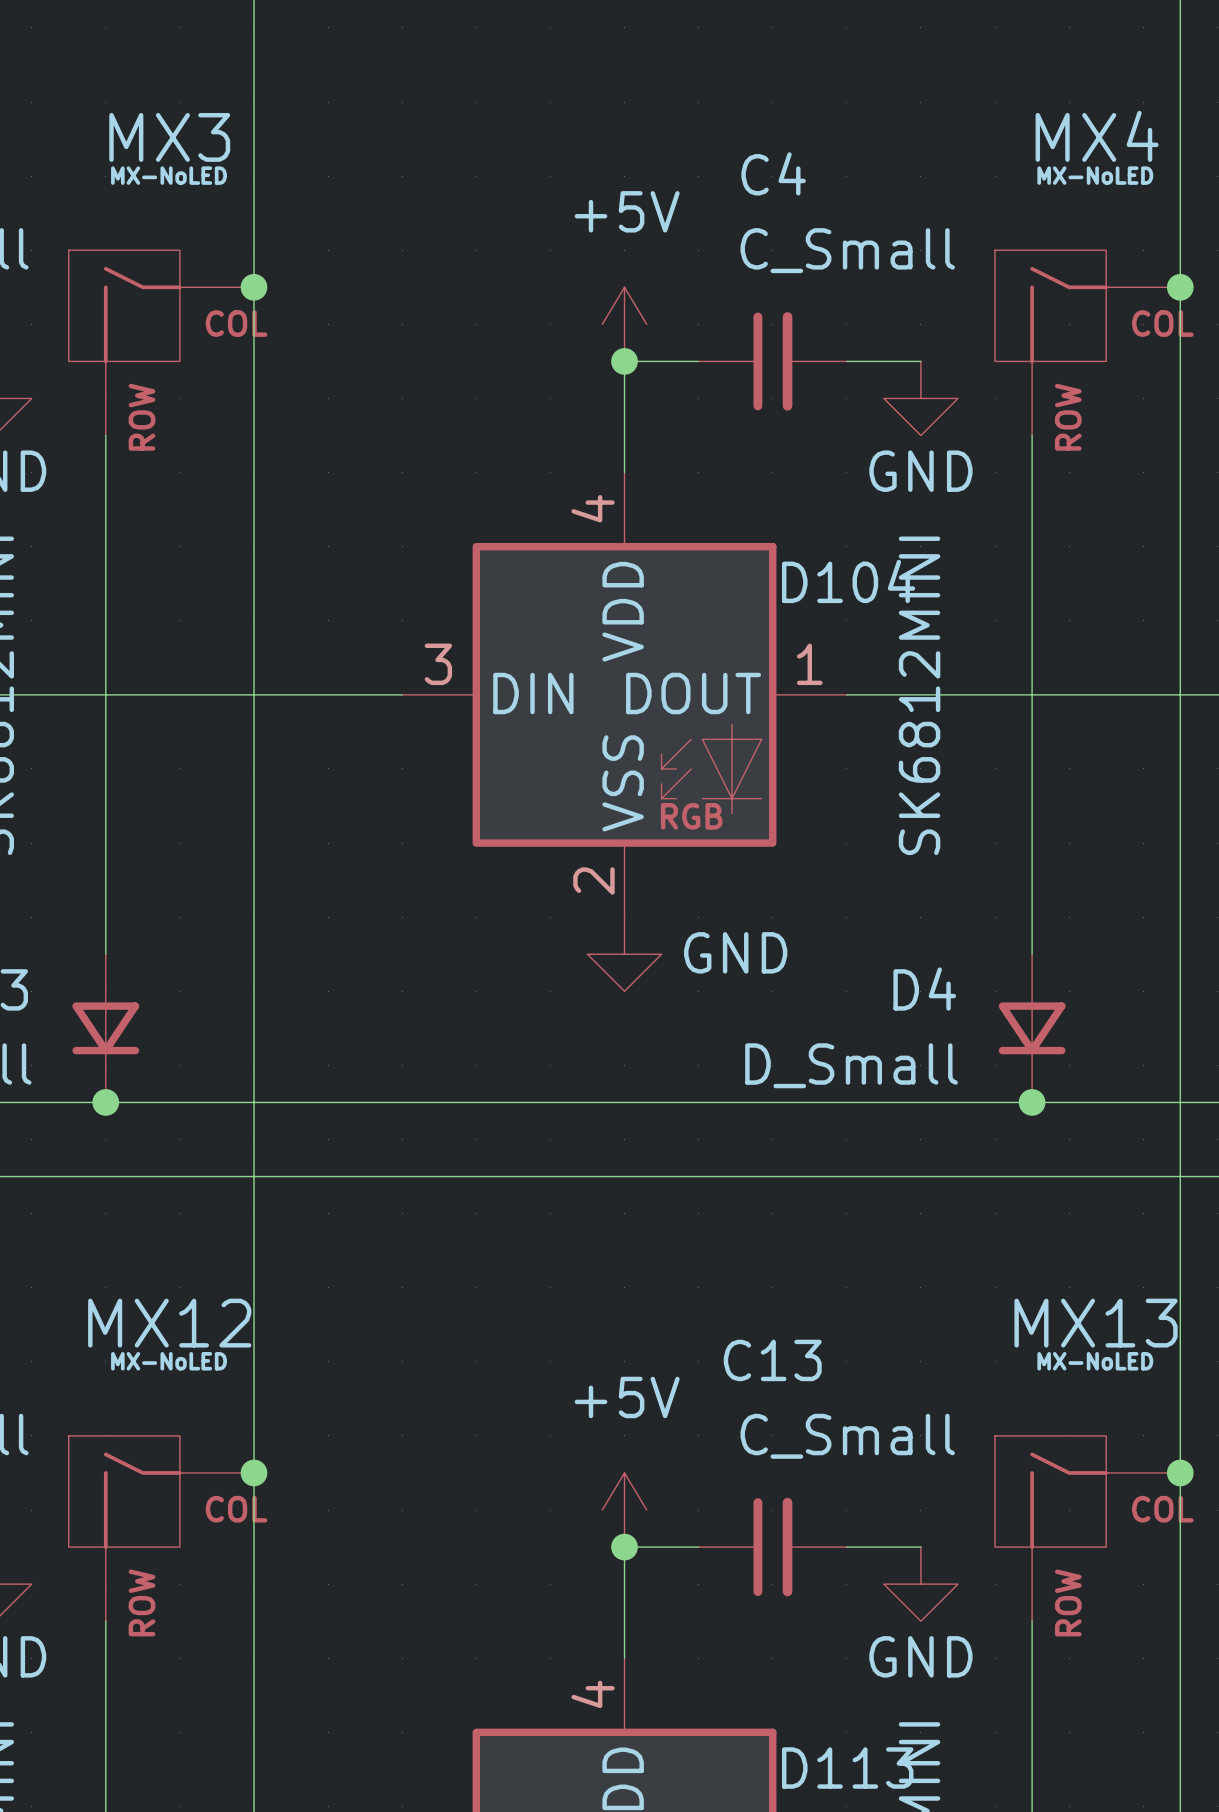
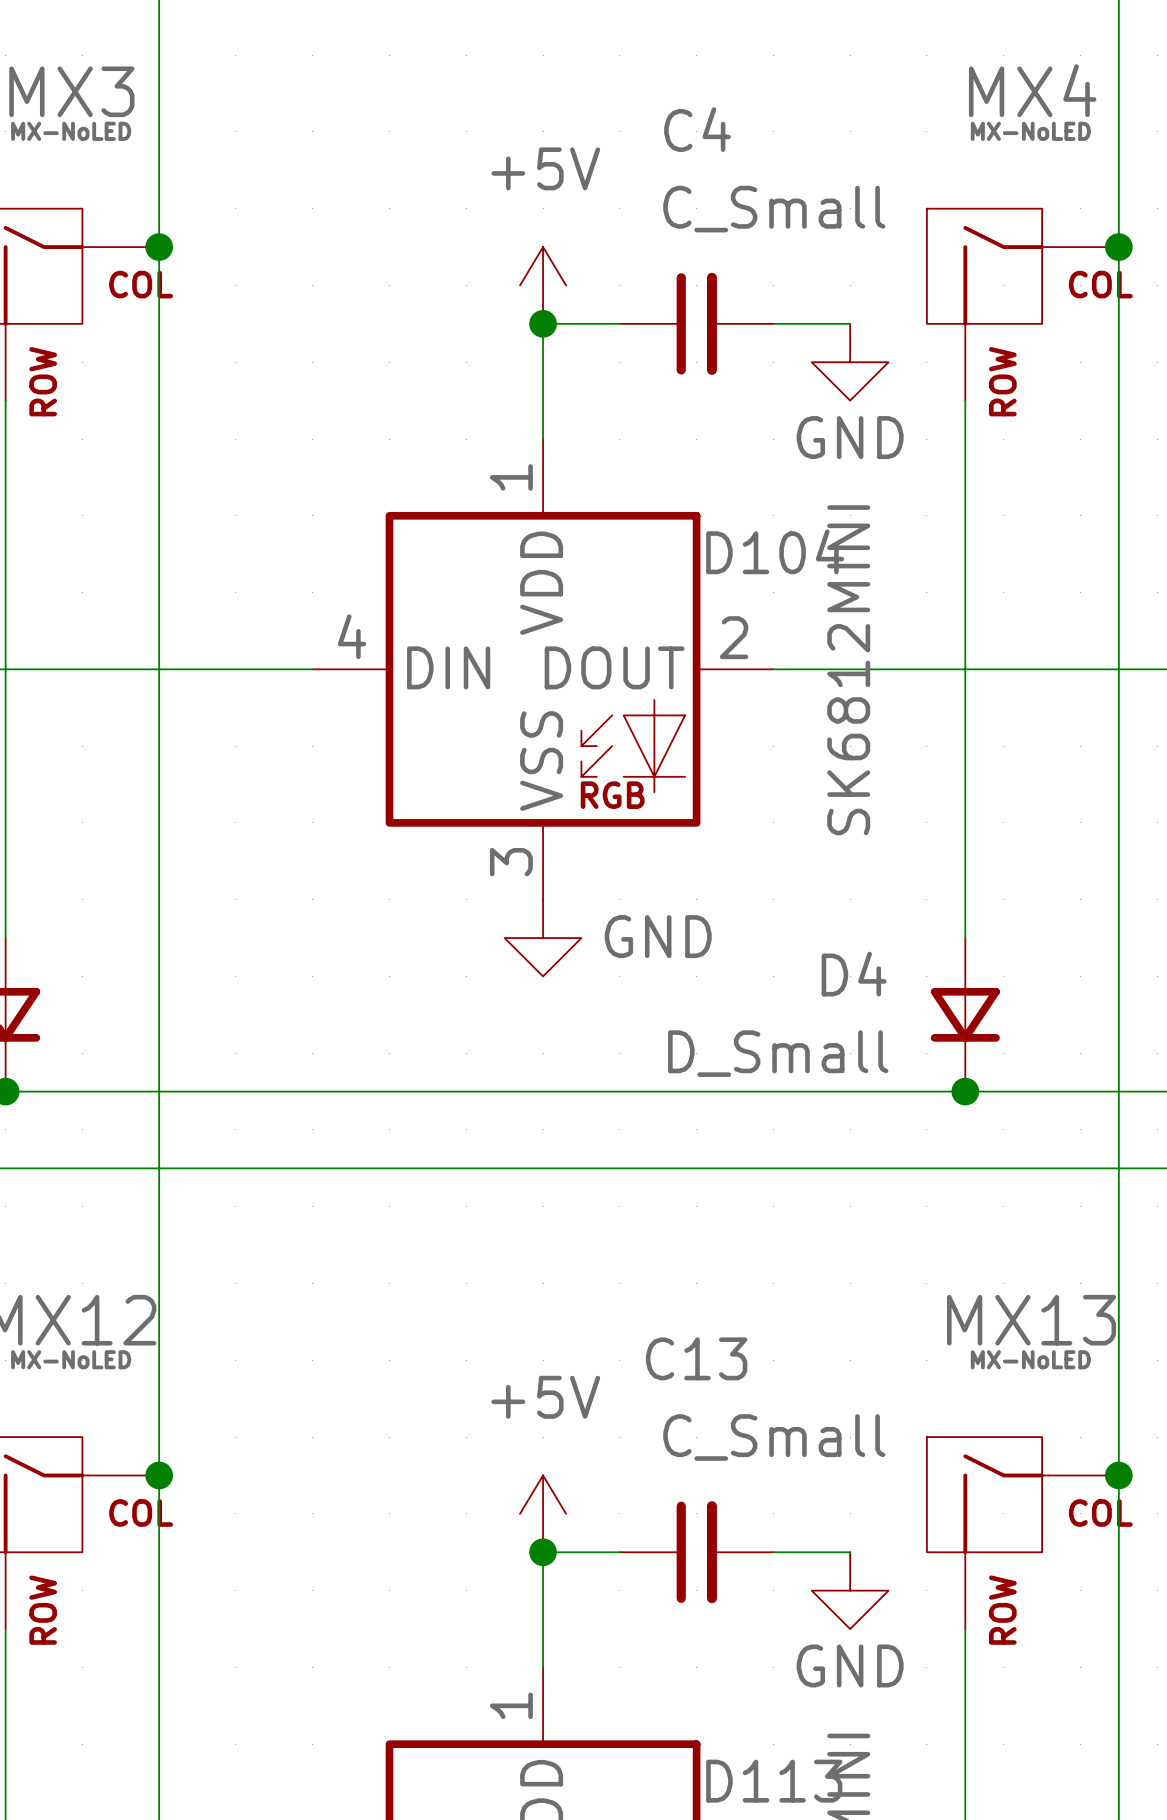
D104 pin number: 4 (593, 508) -> 1 (511, 477)
D104 pin number: 3 (438, 664) -> 4 (352, 636)
D104 pin number: 1 (809, 664) -> 2 (734, 637)
D104 pin number: 2 (593, 881) -> 3 (511, 862)
D113 pin number: 4 (593, 1694) -> 1 (511, 1705)

